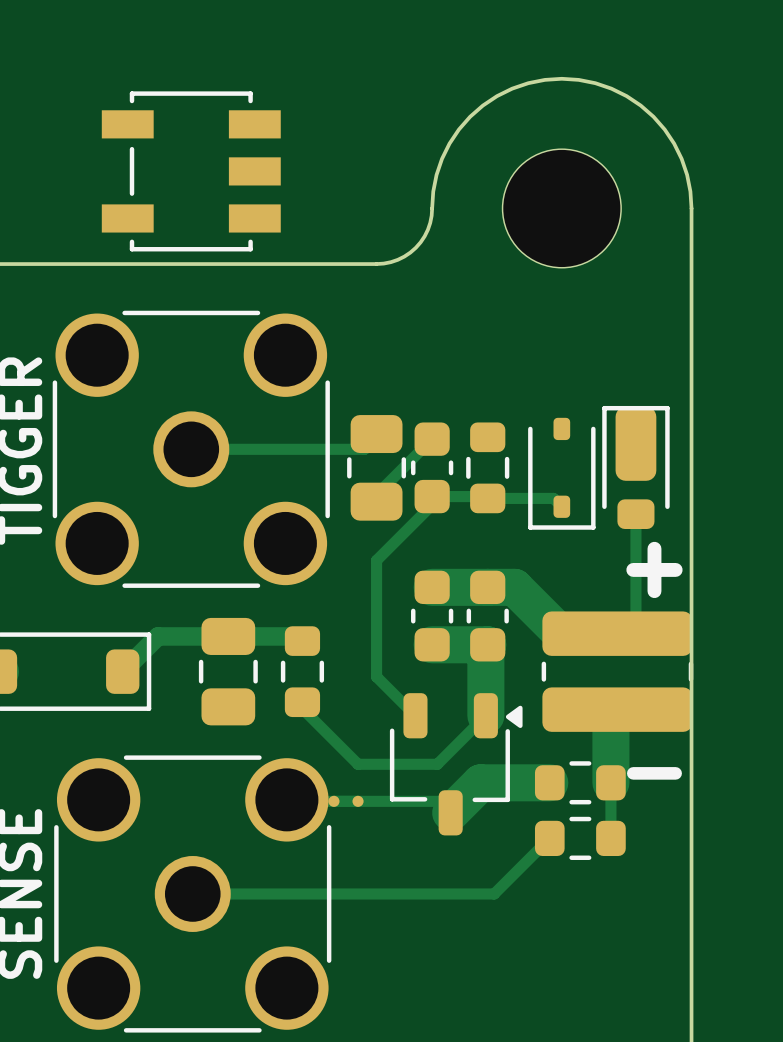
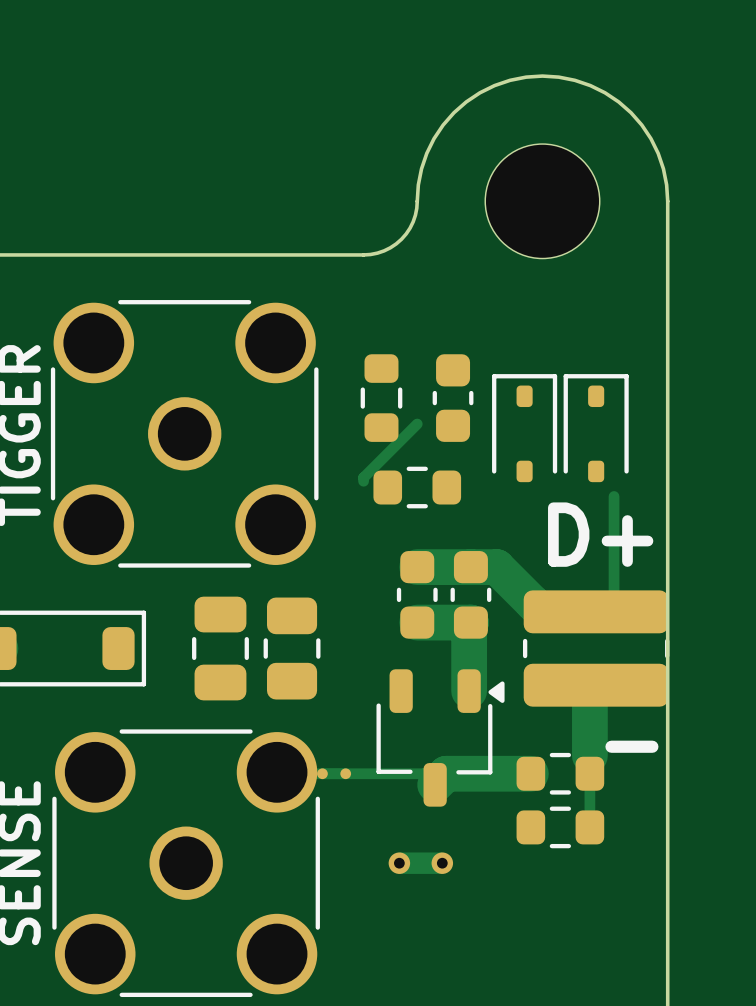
part: (191, 171) -> none
part footprint: [602, 405, 670, 529] -> [563, 374, 629, 483]
part: none -> (381, 398)
track: (376, 437) (364, 449) (172, 449) -> none
part: (376, 467) -> none
part position: (432, 467) -> (453, 398)
part: (487, 467) -> none
part rotation: 0° (561, 473) -> 180° (524, 428)
part: none -> (417, 487)
track: (561, 506) (553, 498) (432, 496) (432, 504) (376, 560) (376, 676) (415, 715) -> none
text: + (654, 569) -> D+ (600, 534)
part footprint: [280, 626, 325, 718] -> [263, 597, 321, 700]
track: (302, 637) (157, 636) (122, 671) -> none
track: (302, 705) (302, 708) (358, 764) (437, 764) (485, 715) -> none
track: (549, 782) (480, 782) (462, 801) -> (530, 773) (446, 773)
part: (580, 782) -> none
part: none -> (560, 773)
track: (549, 838) (494, 893) (172, 893) -> none
part: (580, 838) -> none
part: none -> (560, 827)
part: none -> (420, 863)

